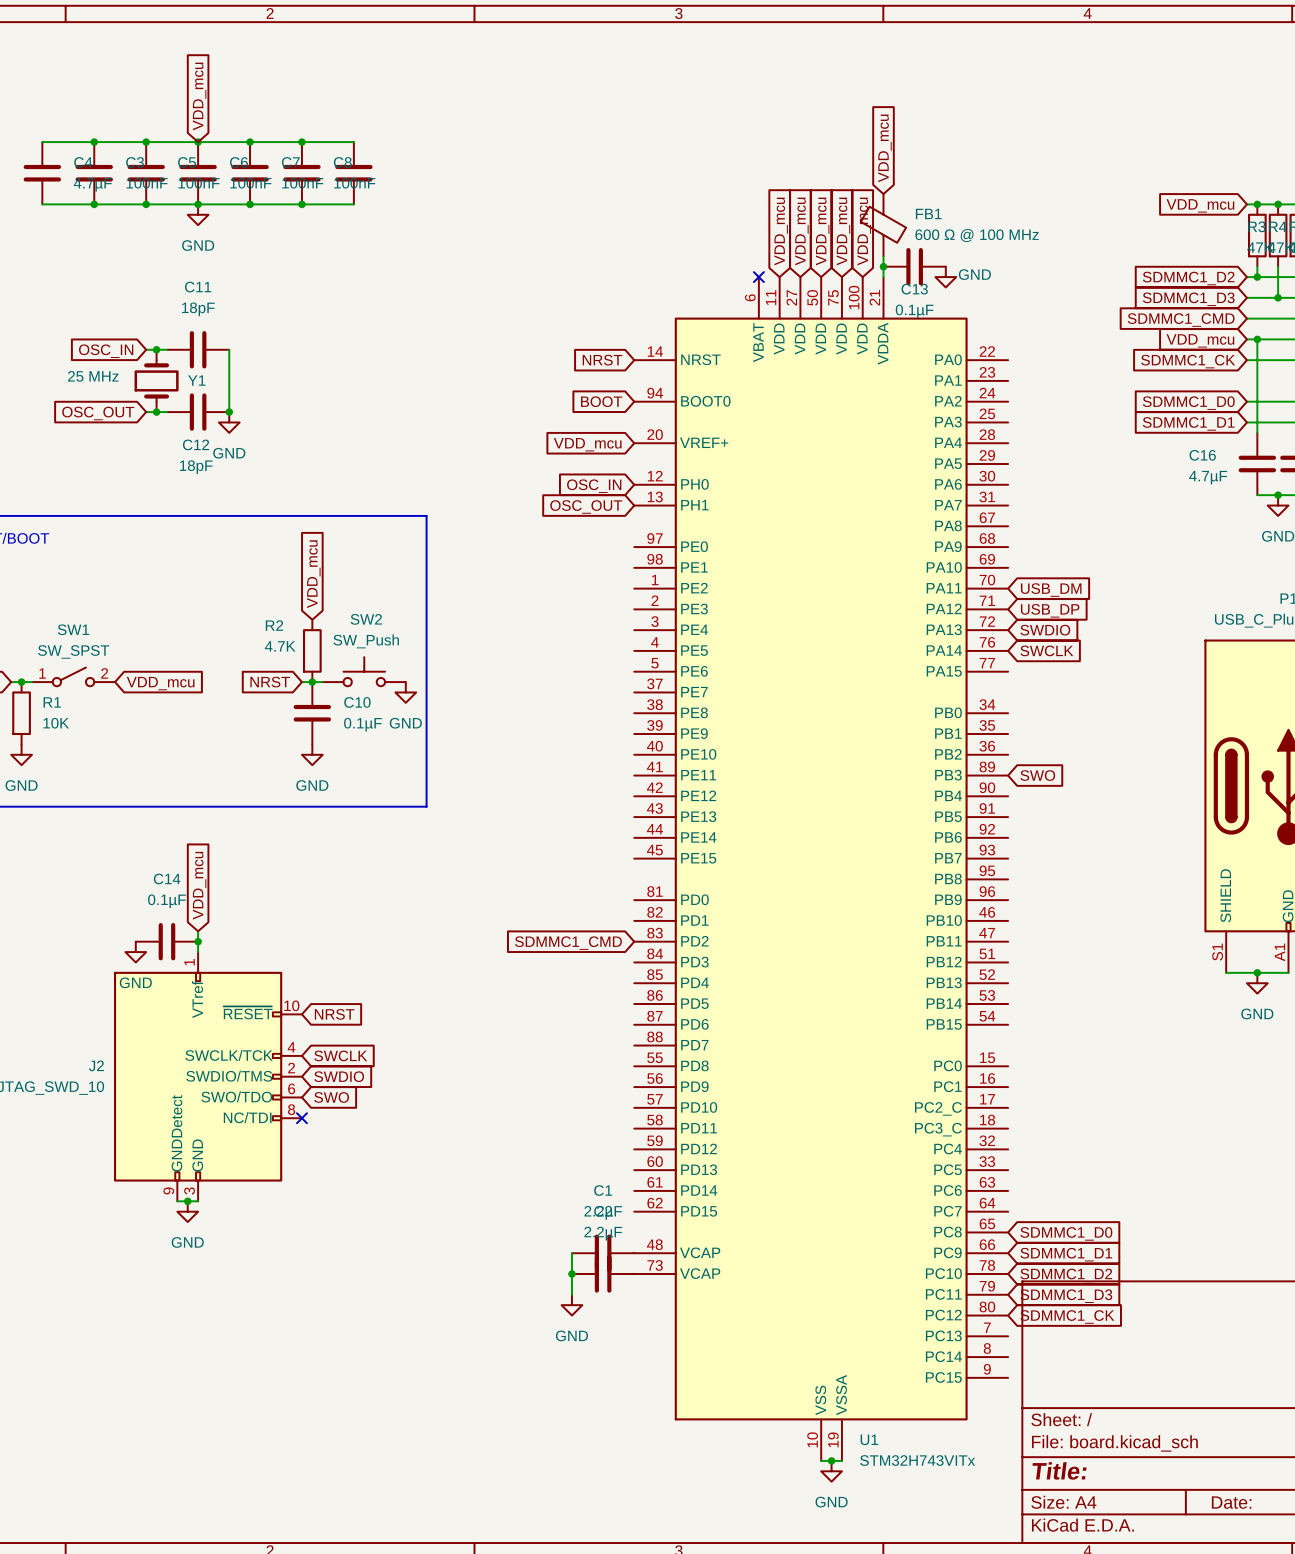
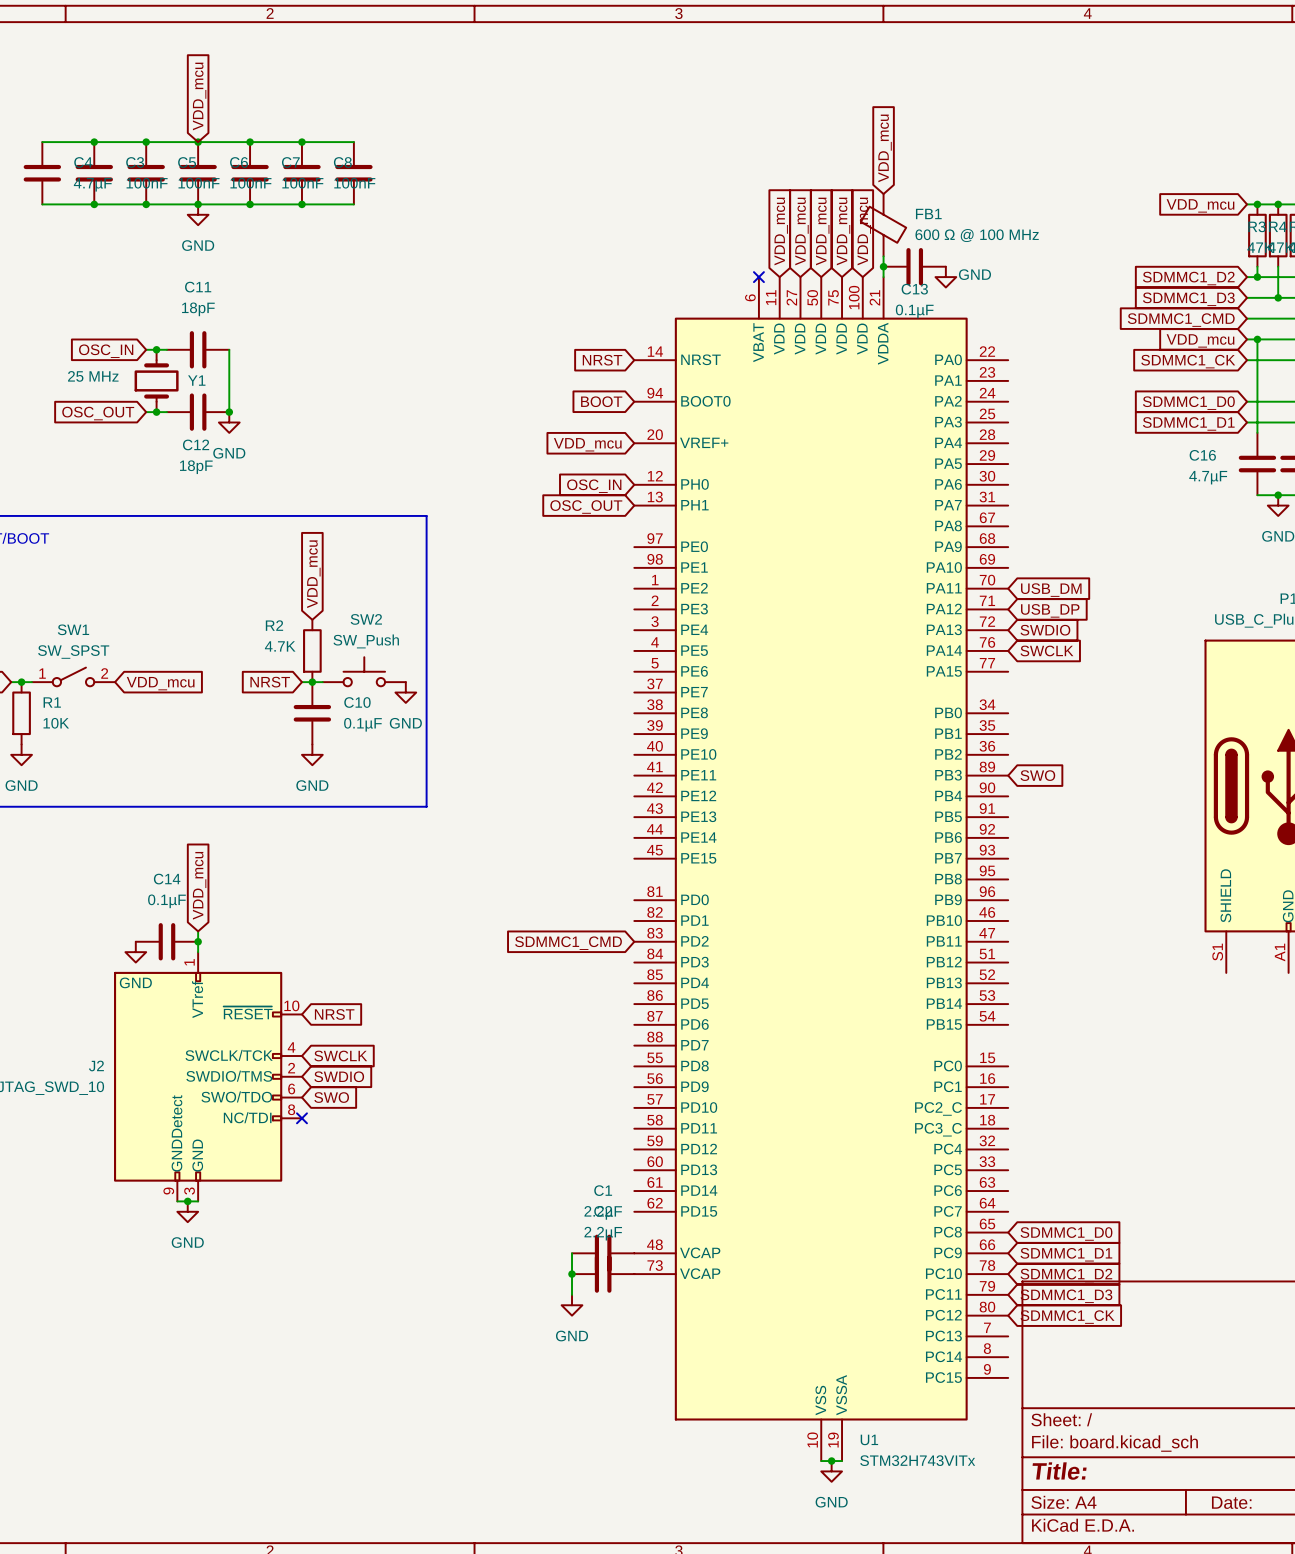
wire: (1226, 972) (1288, 972) -> none
junction: (1257, 972) -> none
power symbol: GND (1257, 983) -> none

